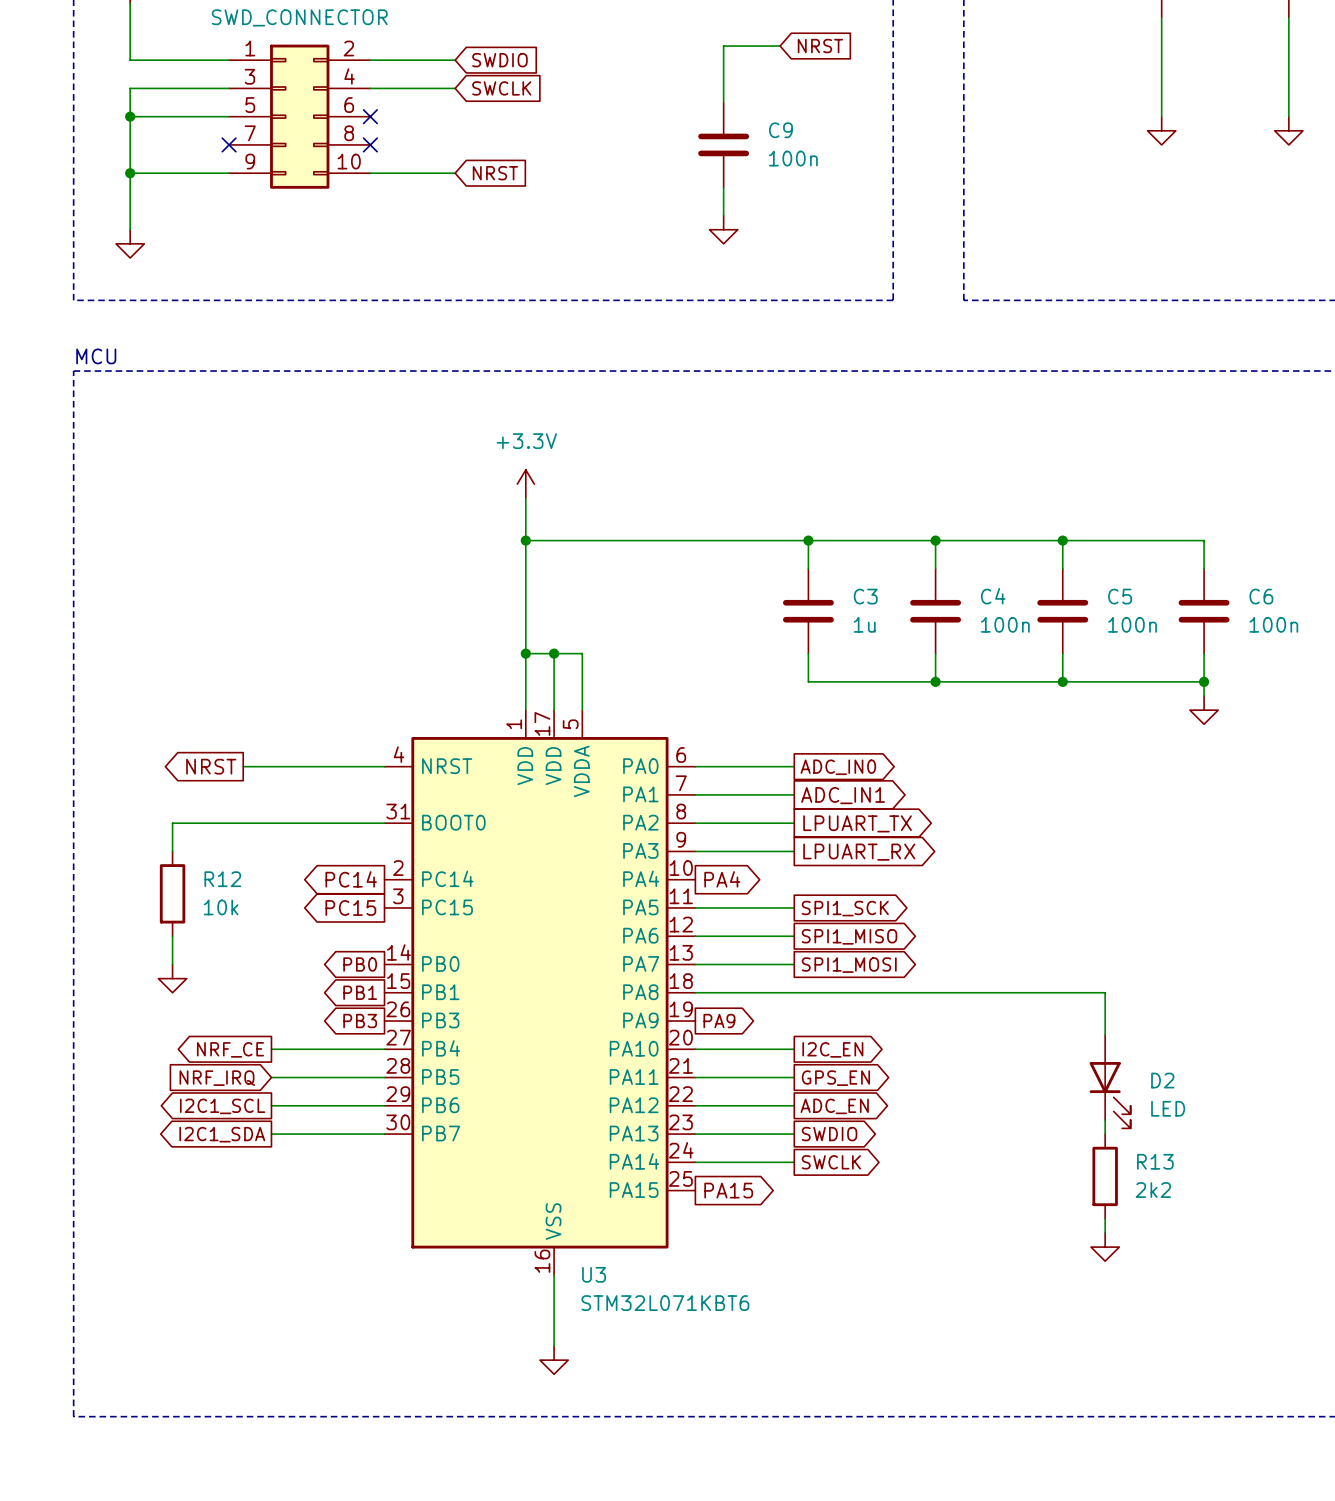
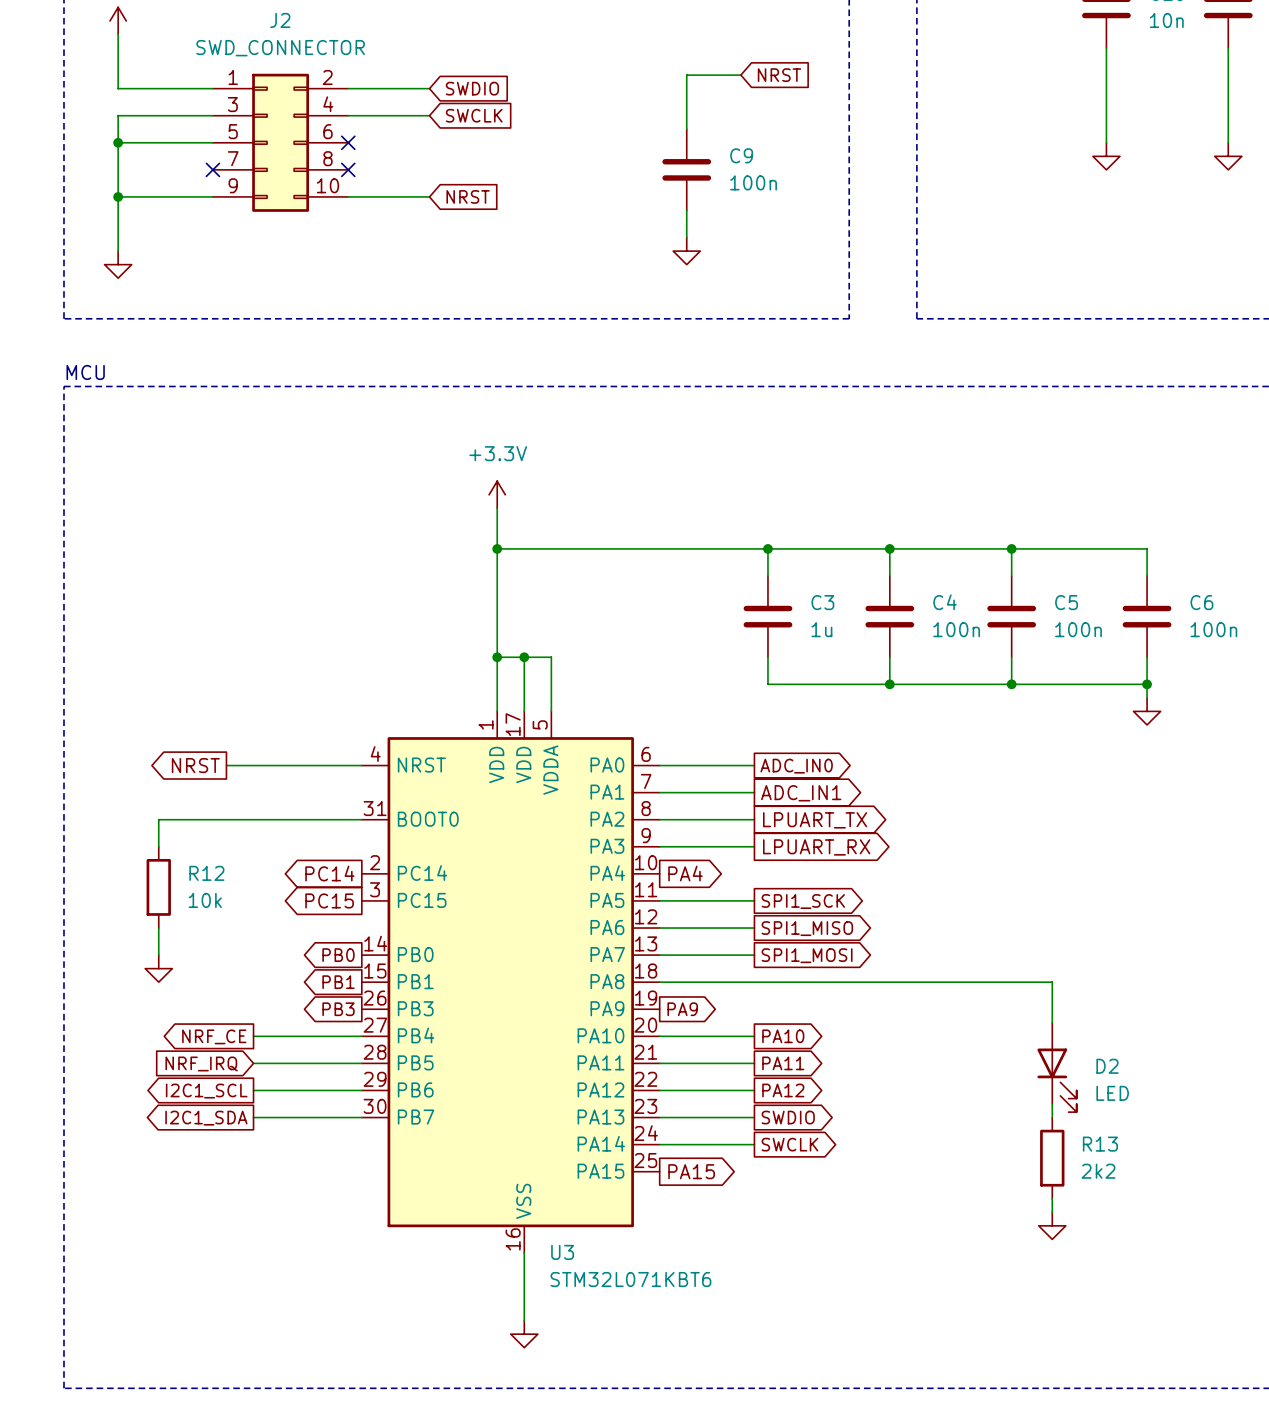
global label: I2C_EN (832, 1049) -> PA10 (783, 1036)
global label: GPS_EN (835, 1078) -> PA11 (783, 1063)
global label: ADC_EN (834, 1106) -> PA12 (783, 1090)

